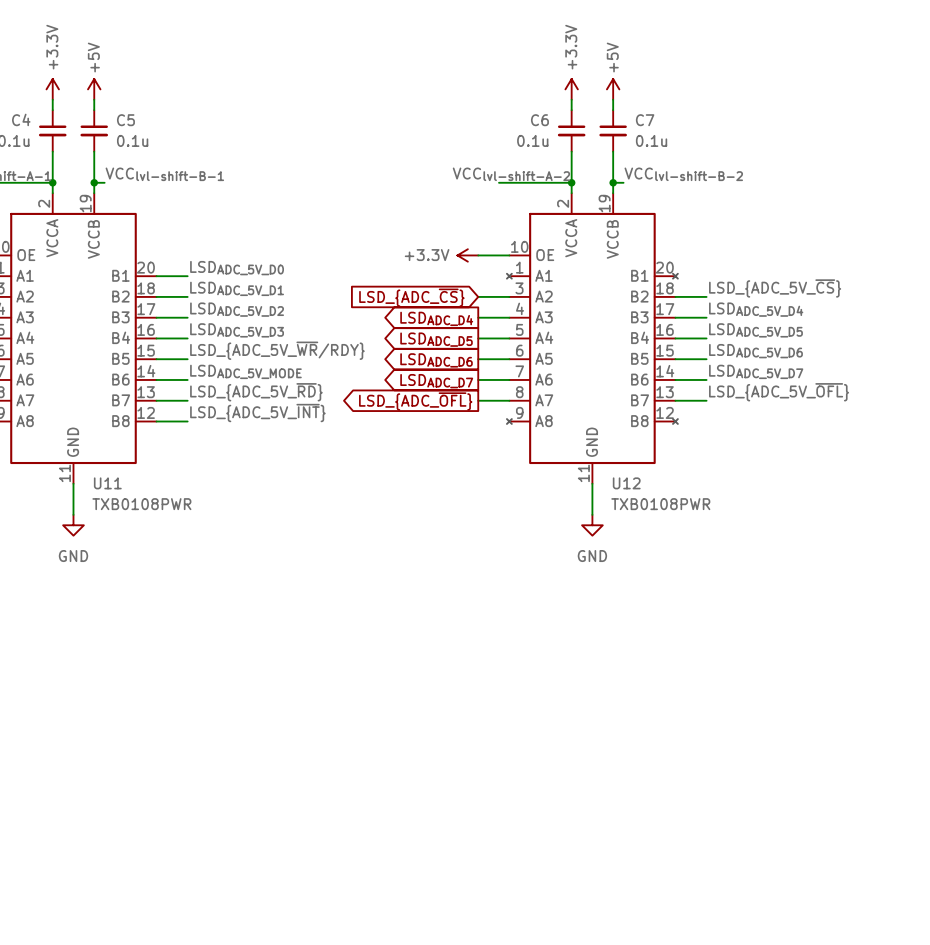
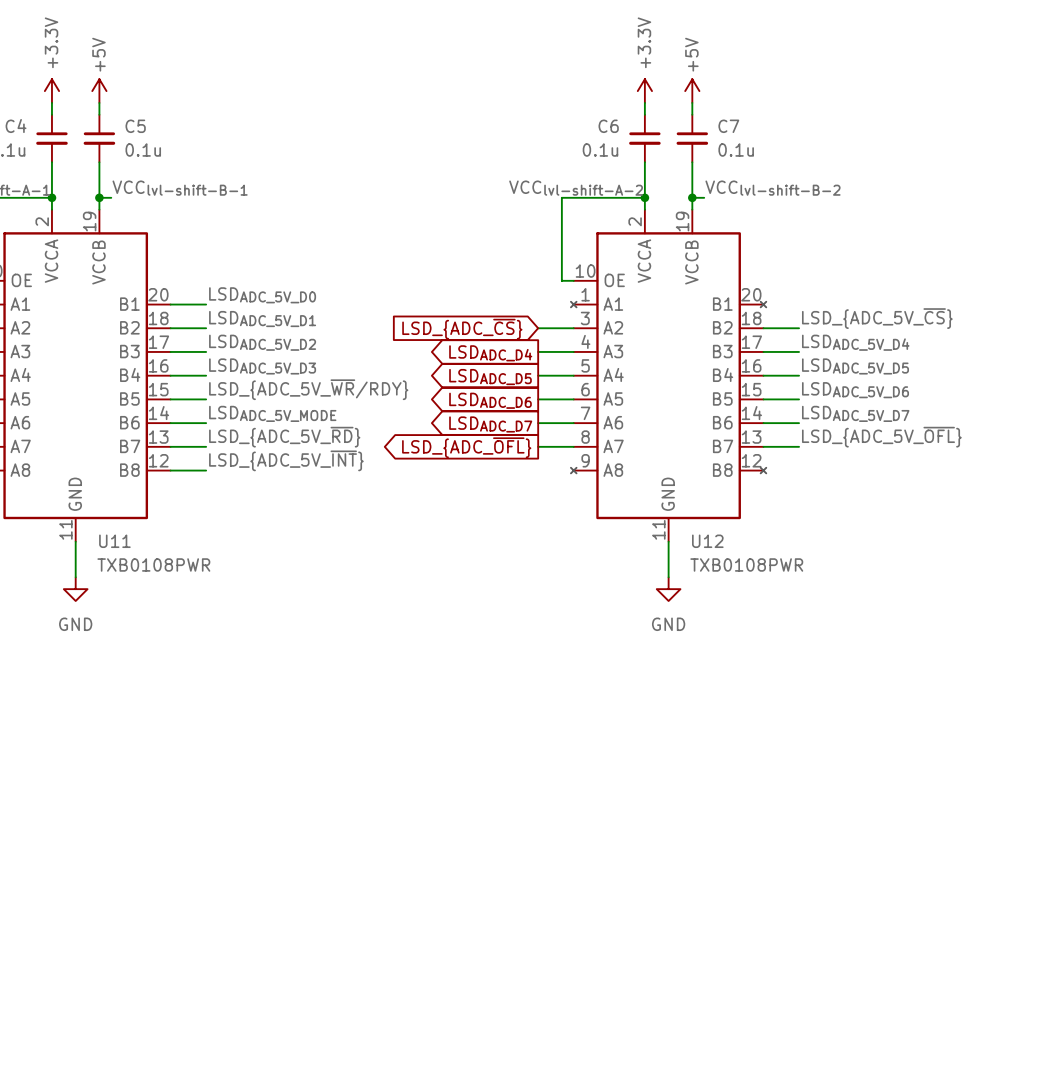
power symbol: +3.3V (467, 255) -> none
wire: (478, 255) (499, 255) -> (561, 197) (561, 280)

